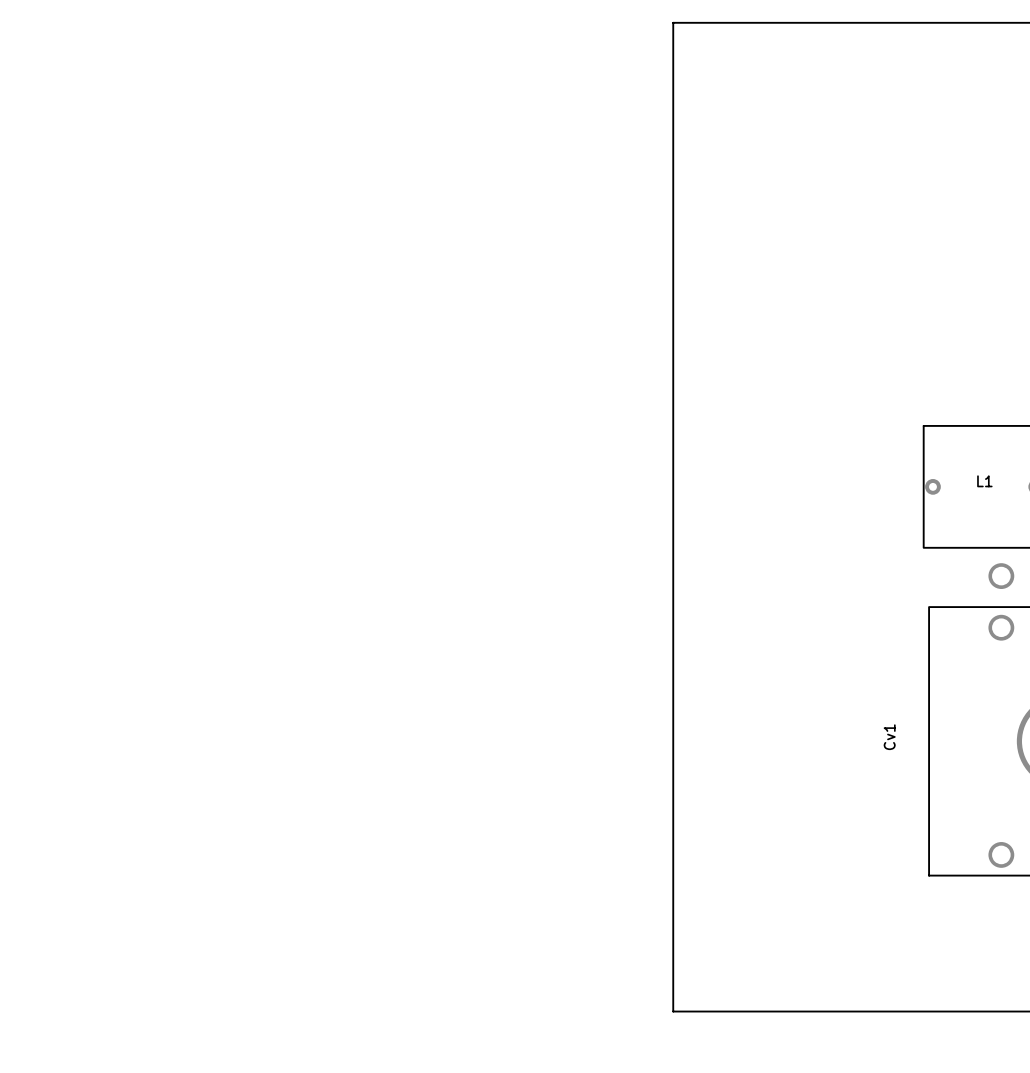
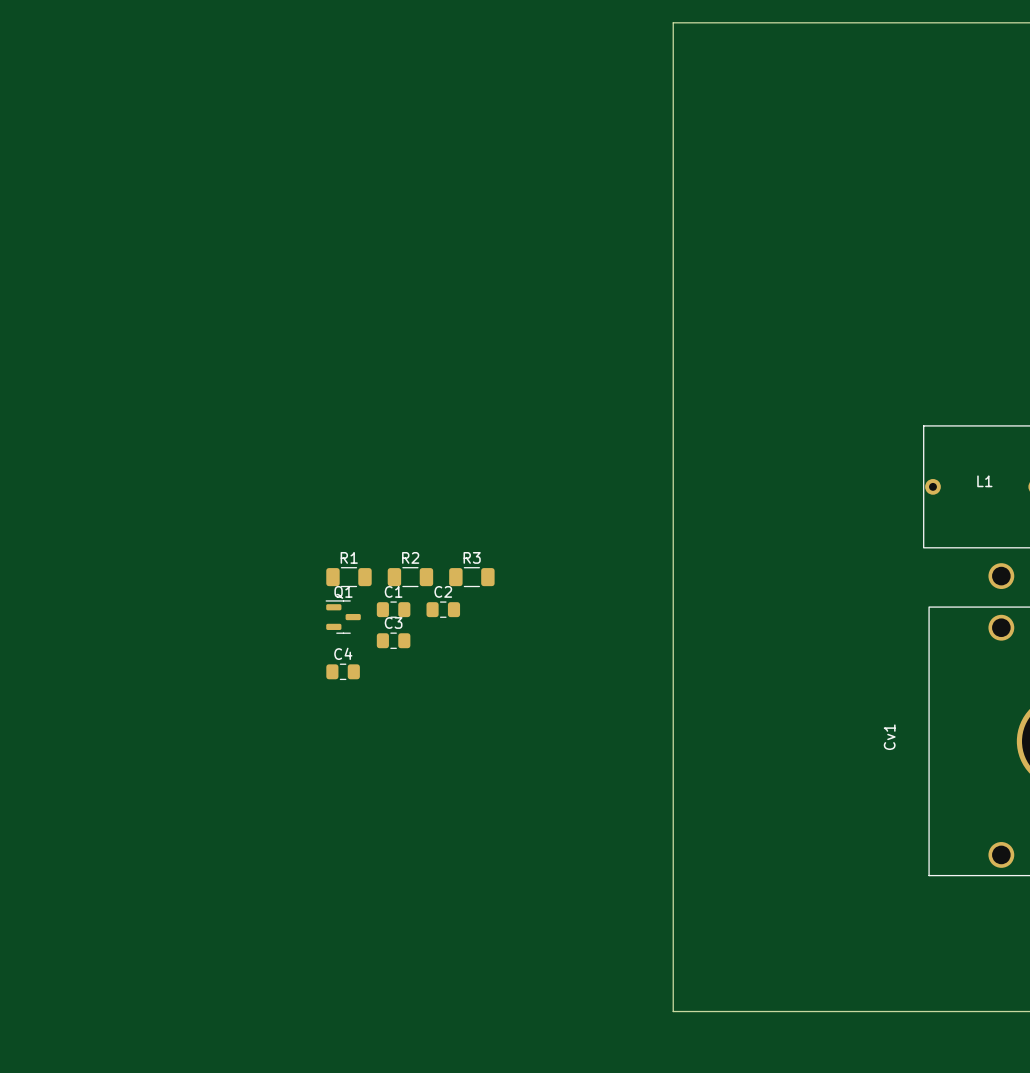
R1: none -> (348, 577)
R2: none -> (410, 577)
R3: none -> (471, 577)
C1: none -> (393, 609)
C2: none -> (443, 609)
Q1: none -> (343, 617)
C3: none -> (393, 640)
C4: none -> (343, 671)

